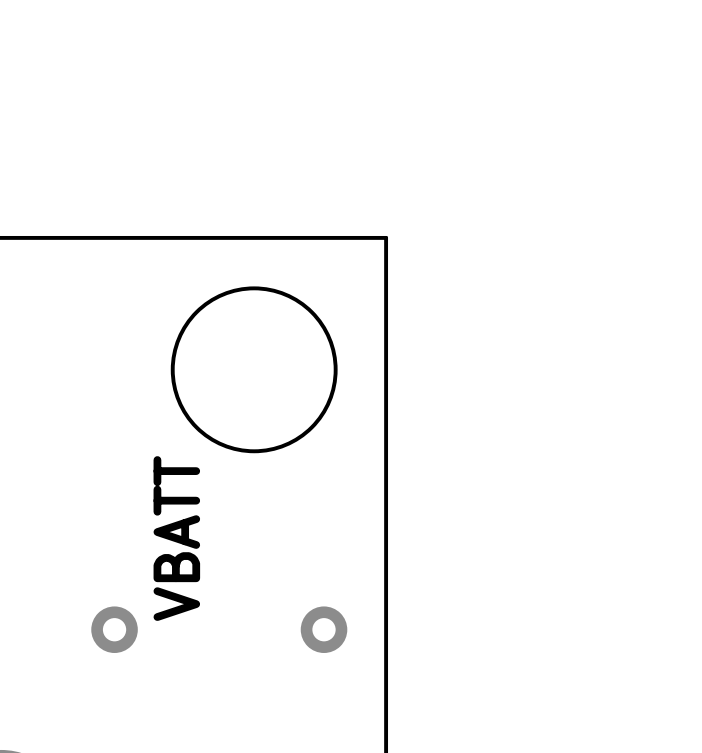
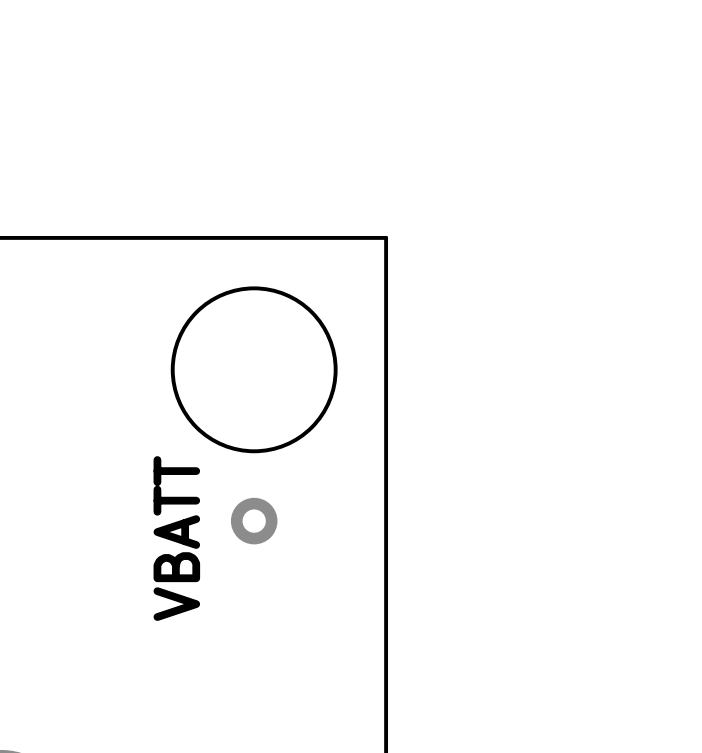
via: none -> (254, 521)
via: (114, 629) -> none
via: (324, 629) -> none

